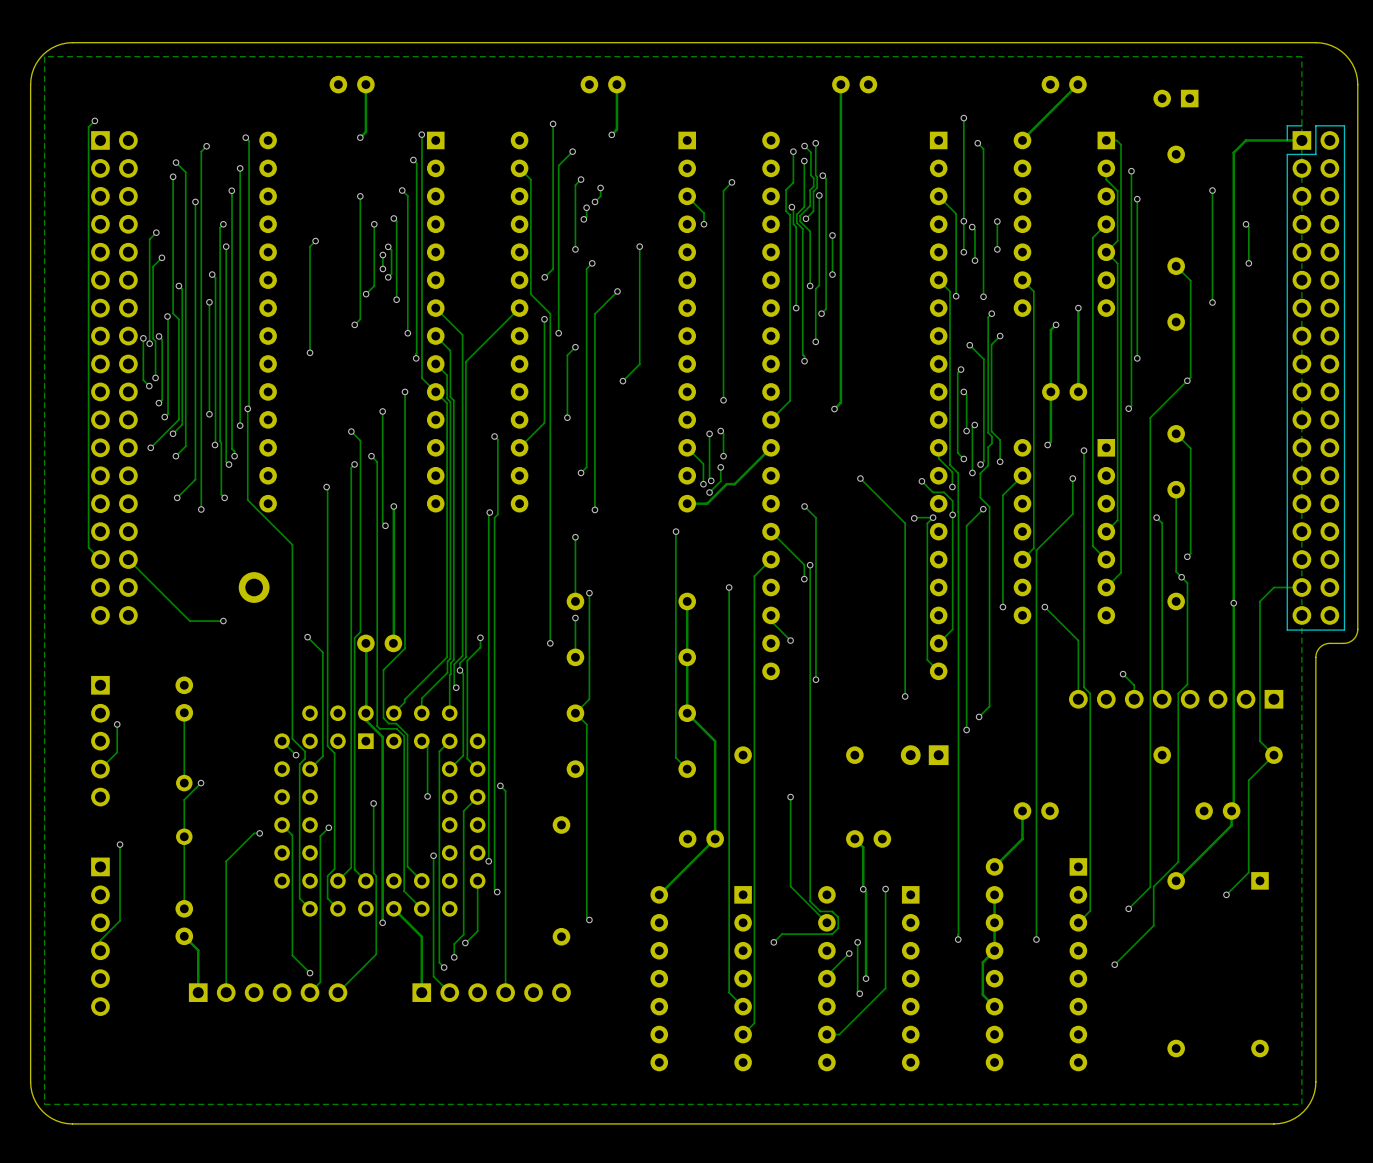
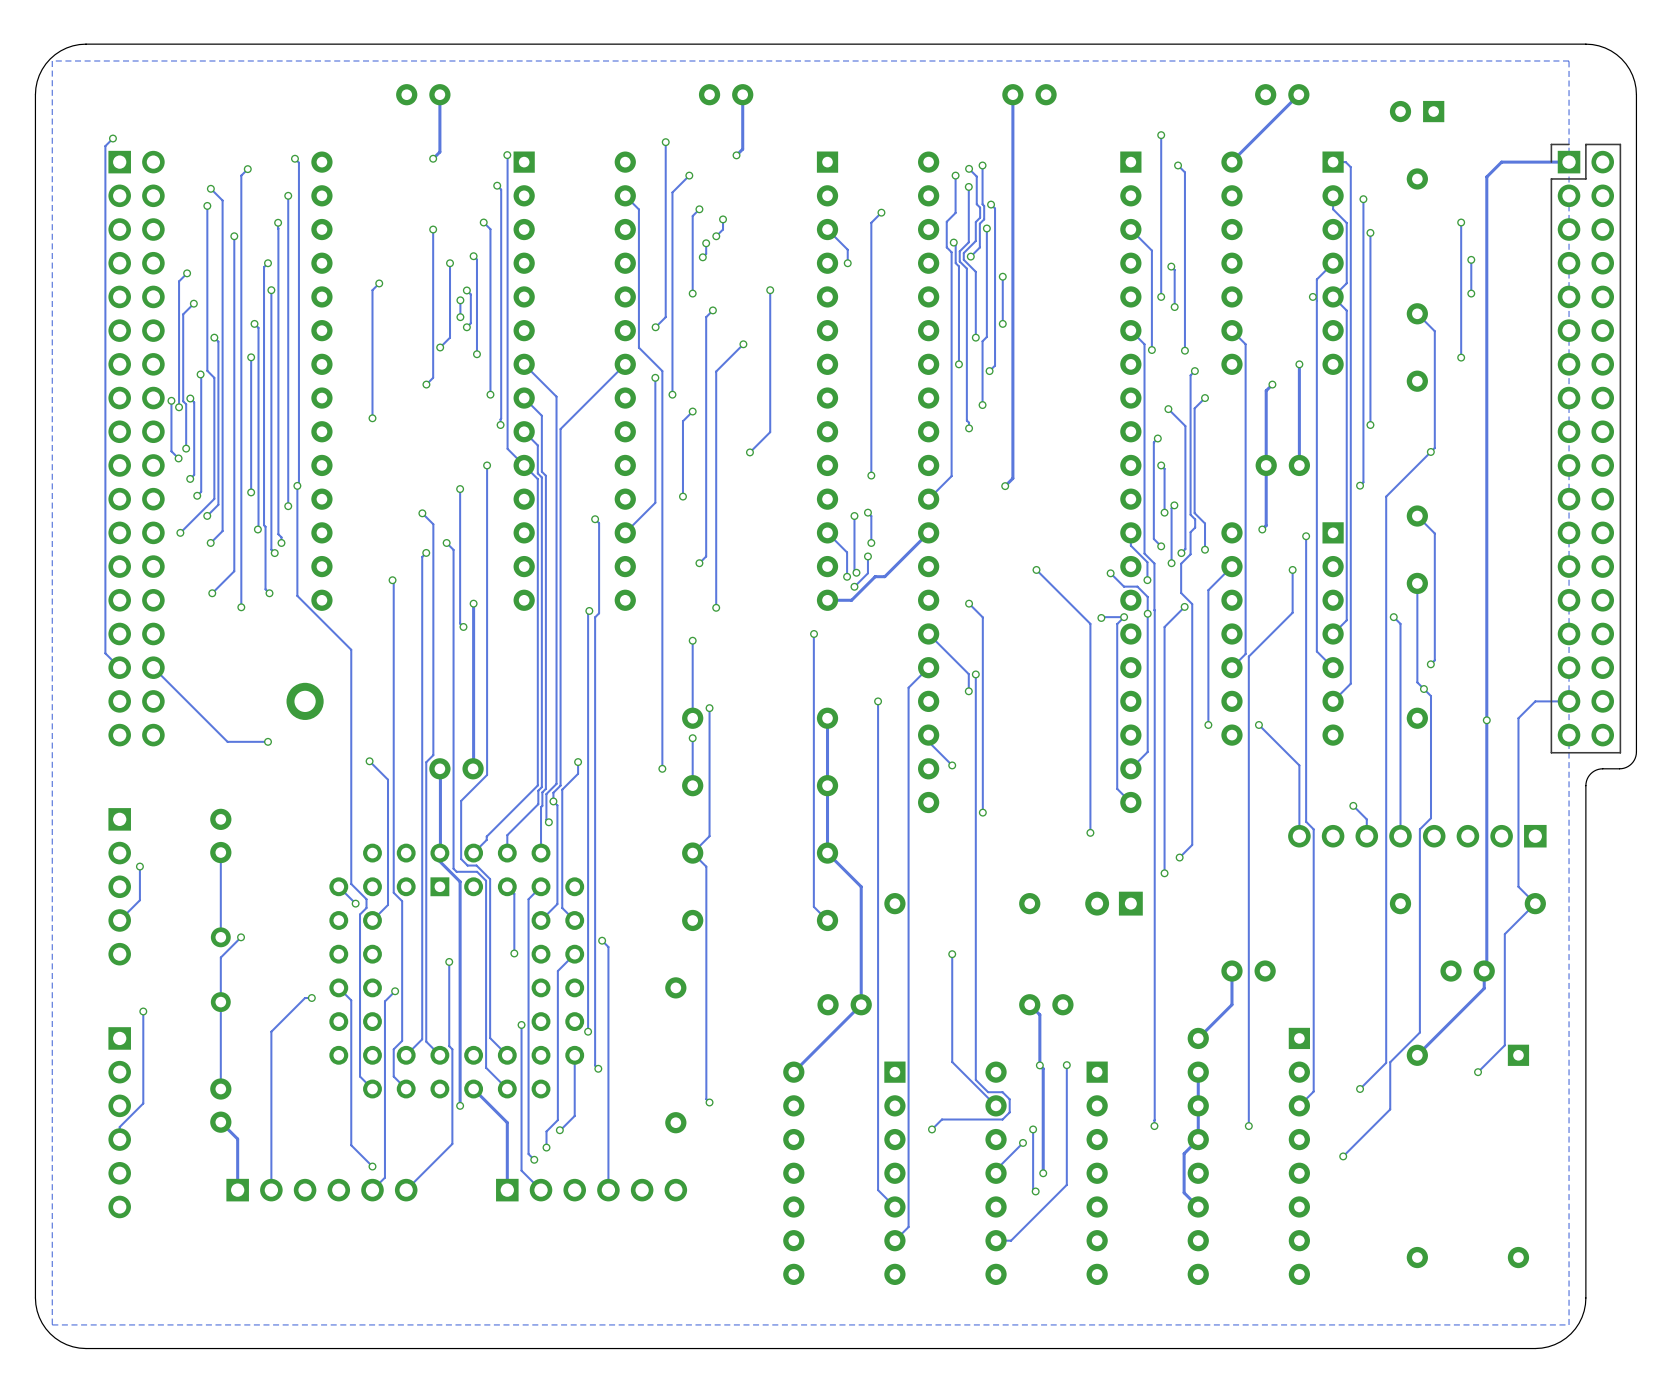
via: (963, 221) -> none
track: (997, 221) (997, 249) -> (1471, 259) (1471, 293)
via: (997, 221) -> none
via: none -> (1471, 259)
track: (1246, 224) (1248, 227) (1248, 263) -> none
via: (1246, 224) -> none
via: (997, 249) -> none
via: none -> (1471, 293)
via: none -> (1312, 296)
via: (1248, 263) -> none

